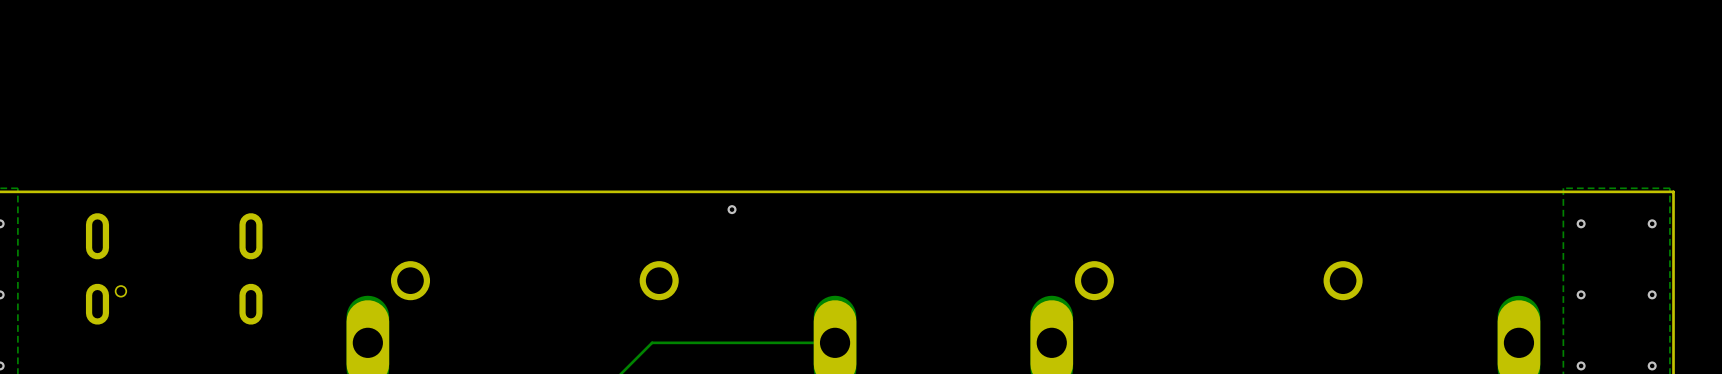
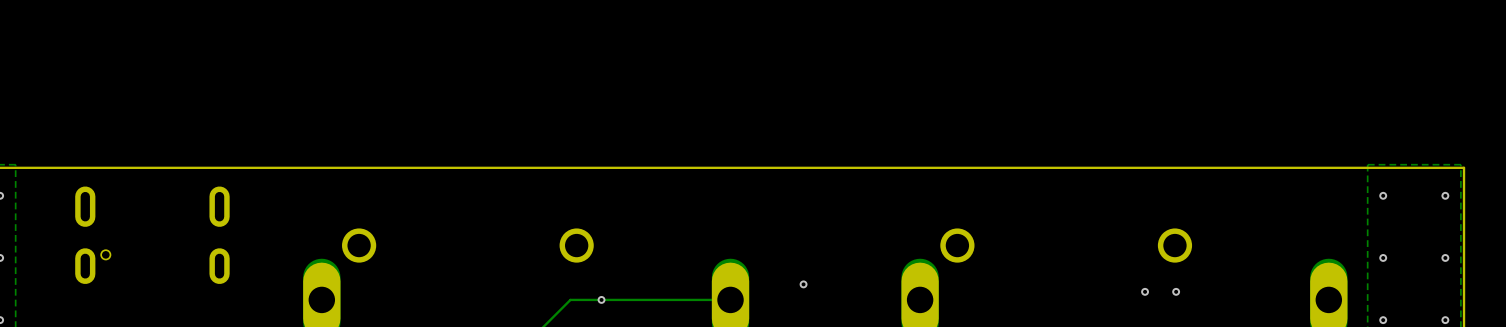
via: (732, 209) -> none
via: none -> (803, 284)
via: none -> (1145, 291)
via: none -> (1176, 291)
via: none -> (601, 299)

